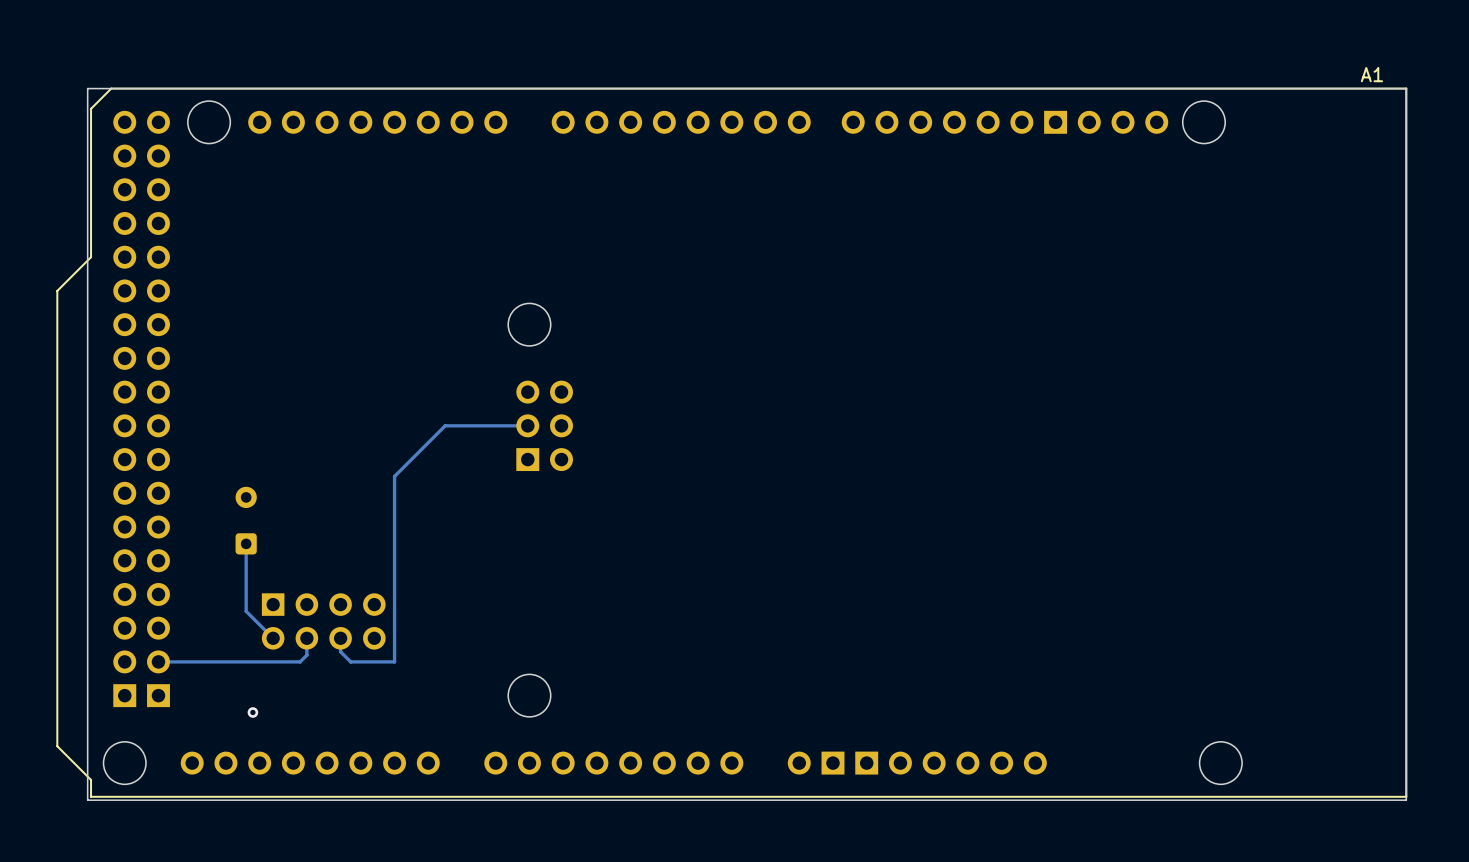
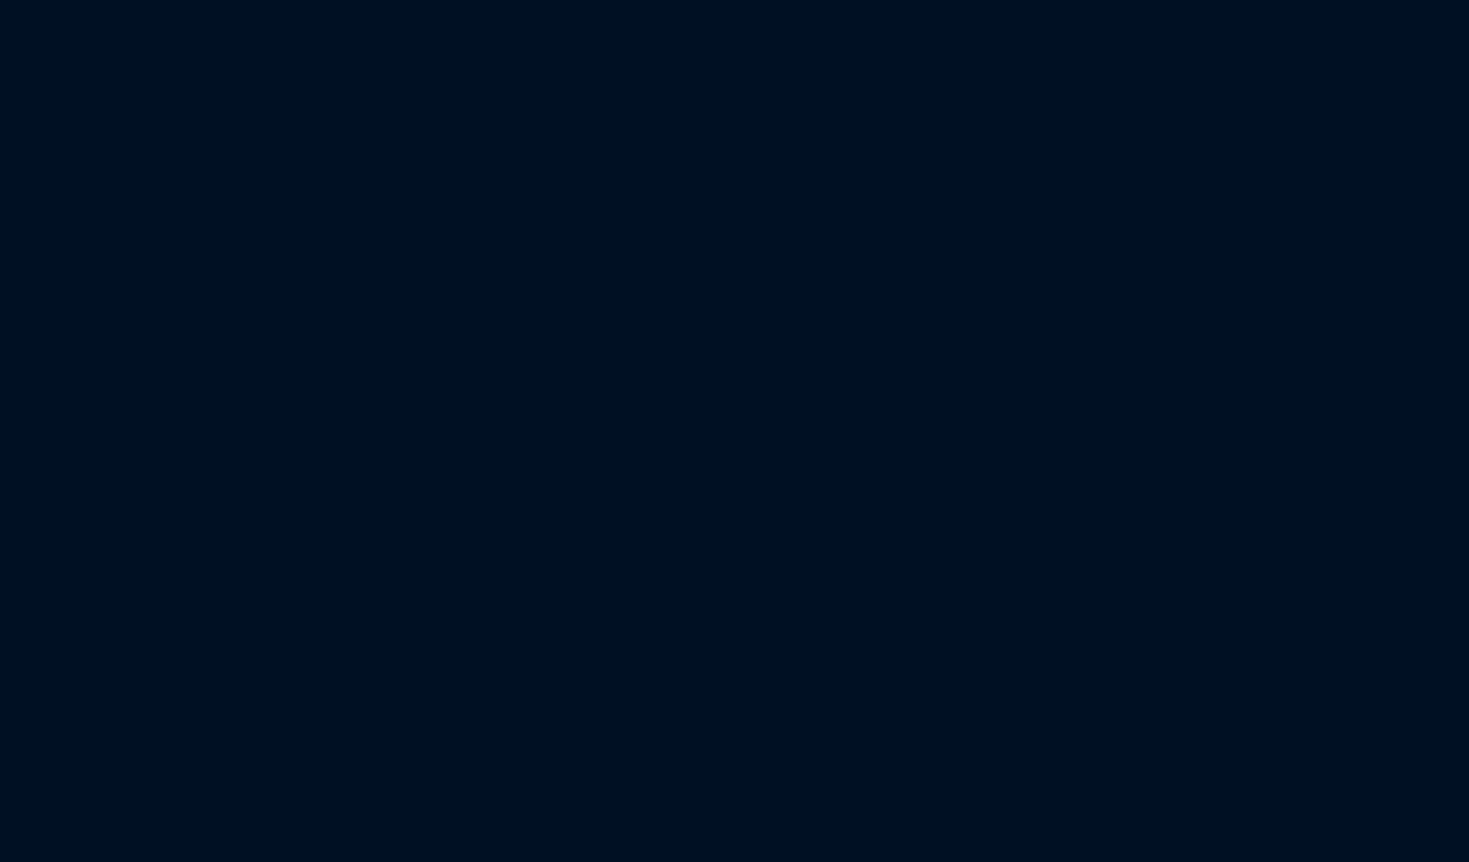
board edge: (1406, 88) (87, 88) (87, 800) (1406, 800) (1406, 88) -> none
track: (527, 425) (445, 425) (394, 476) (394, 661) (350, 661) (340, 651) (340, 638) -> none
A1: (731, 442) -> none
part: (246, 520) -> none
track: (246, 543) (246, 611) (273, 638) -> none
part: (323, 621) -> none
track: (306, 638) (306, 655) (300, 661) (158, 661) -> none
via: (252, 712) -> none

